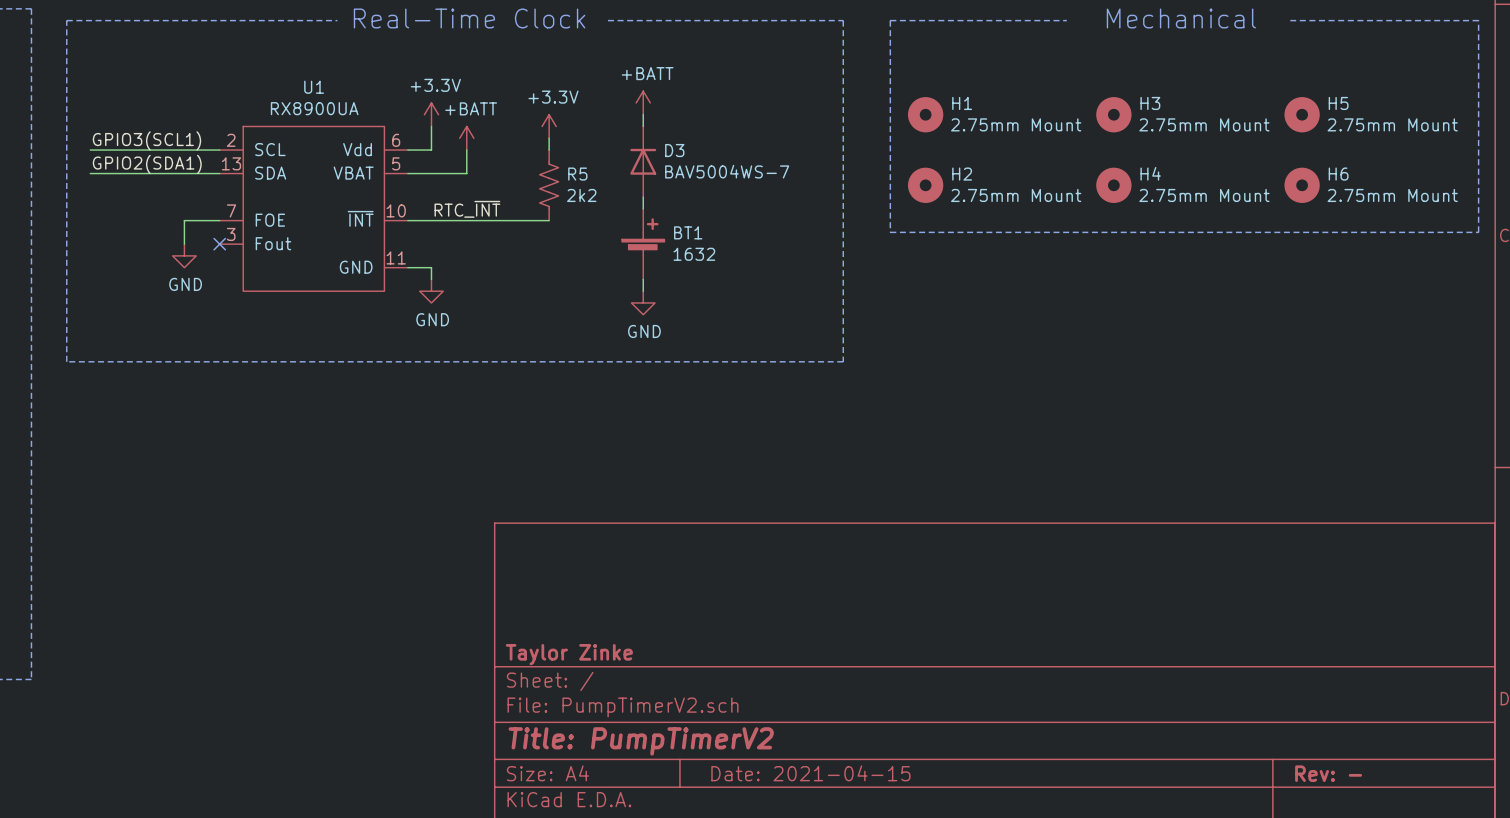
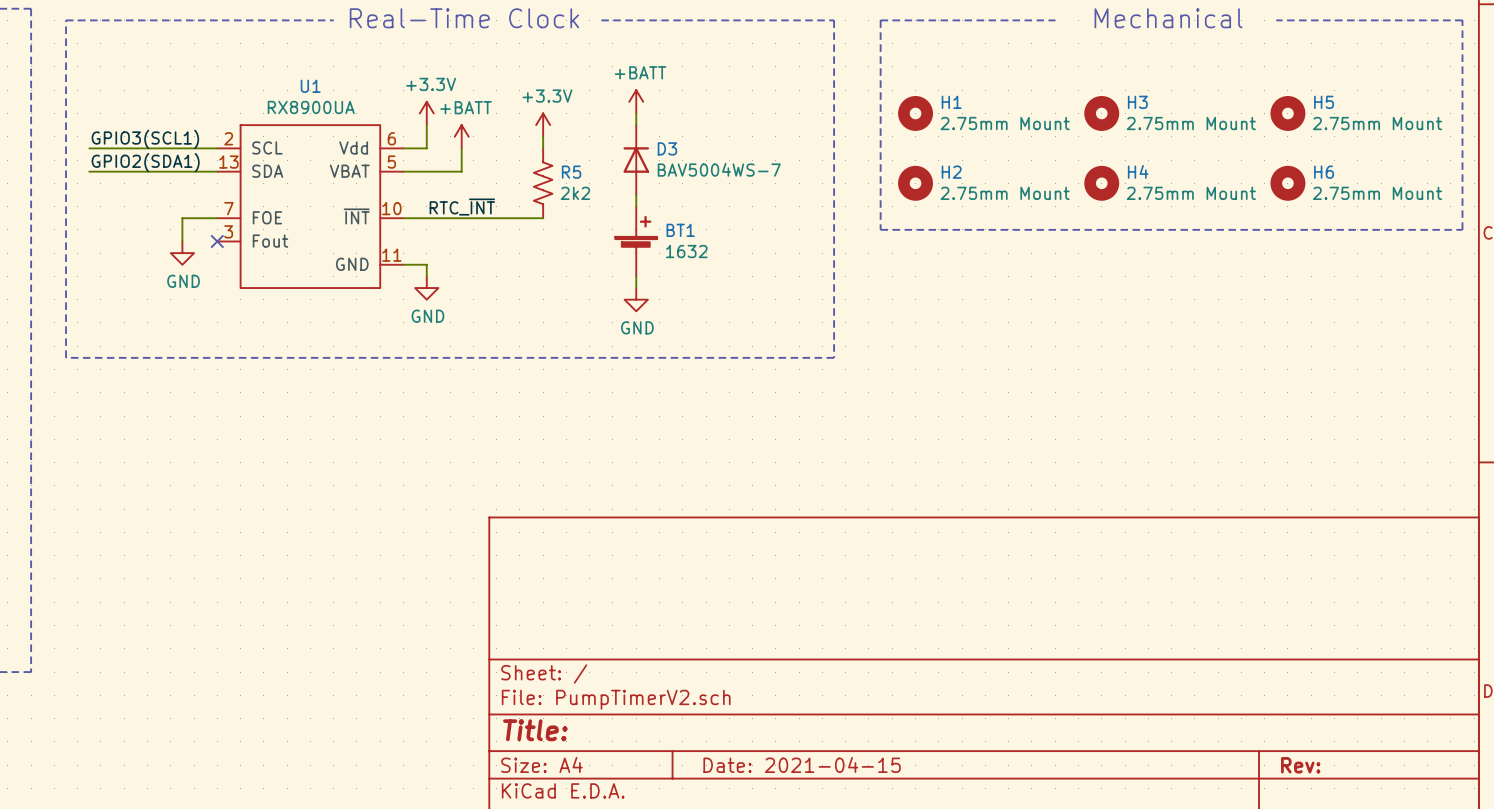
title block: Taylor Zinke (569, 654) -> none
title block: Title: PumpTimerV2 (641, 741) -> Title: (535, 730)
title block: Rev: - (1328, 773) -> Rev: (1300, 765)

